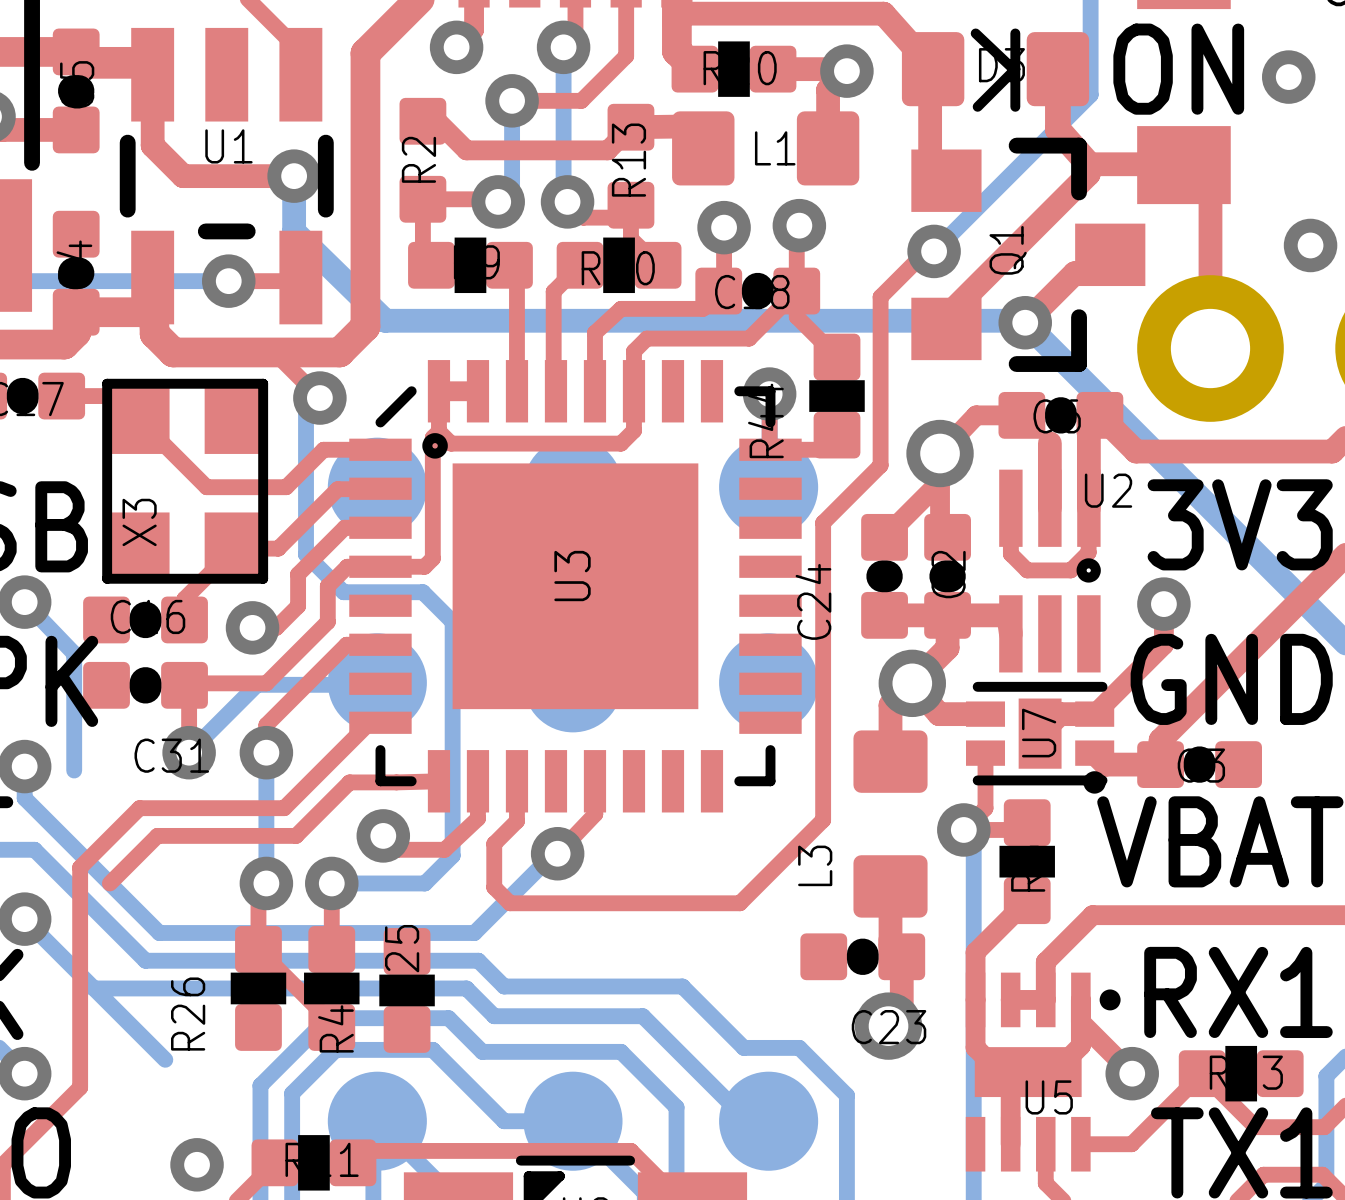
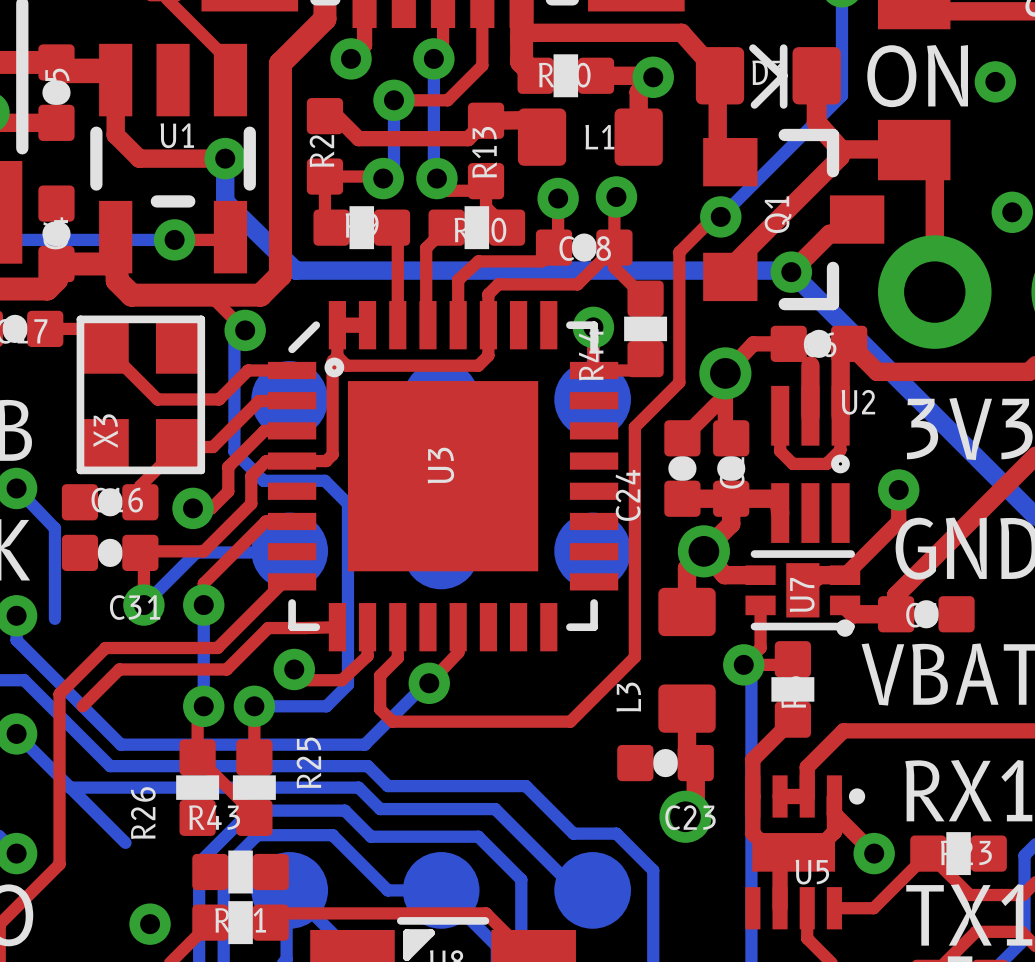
R43 rotation: 0° (407, 990) -> 90° clockwise (240, 871)
R43 position: (407, 990) -> (240, 871)

